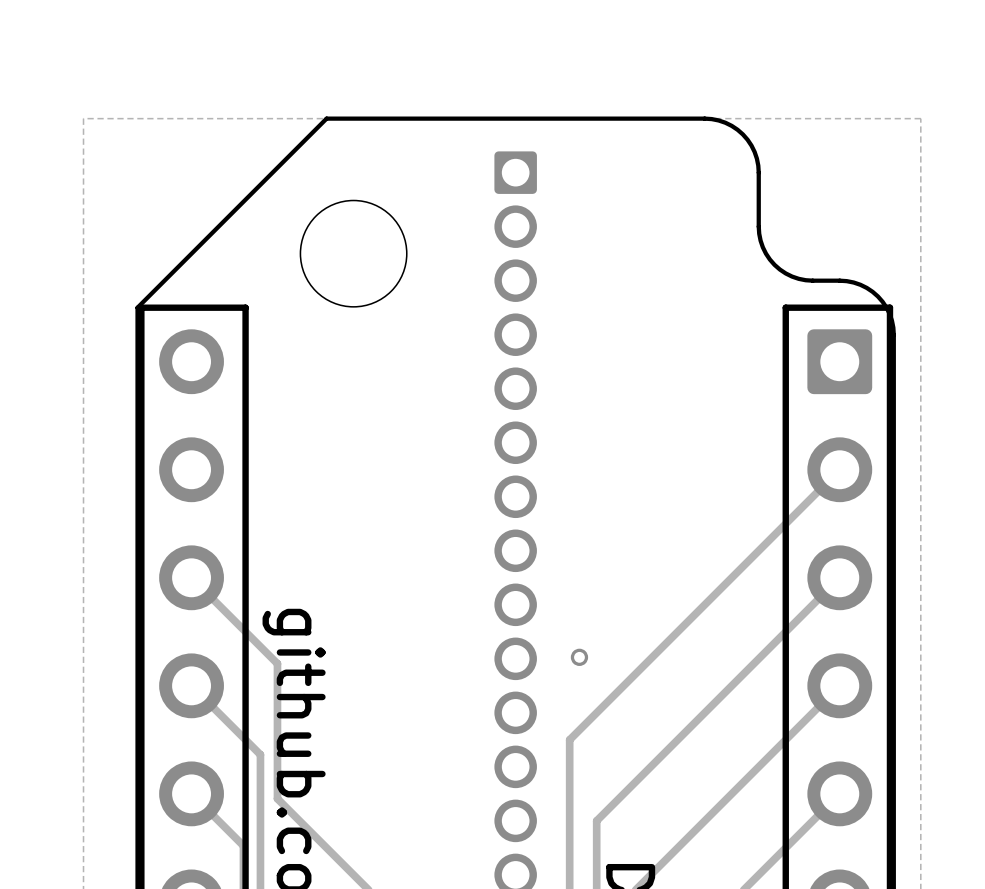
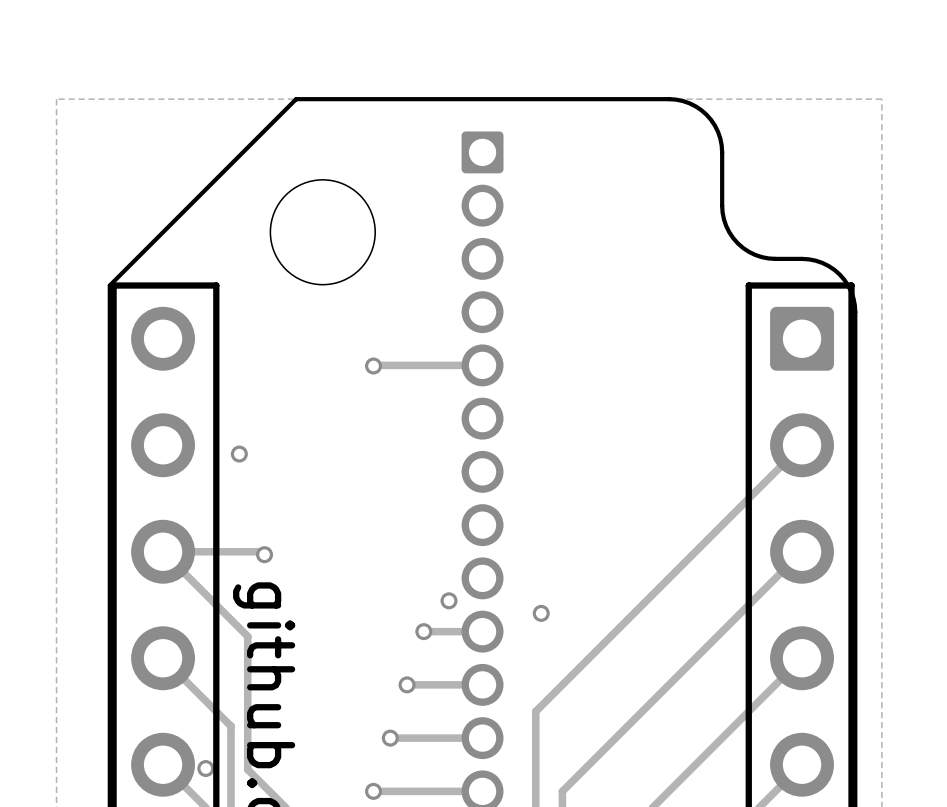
track: none -> (482, 365) (373, 366)
via: none -> (373, 366)
via: none -> (239, 454)
track: none -> (163, 551) (261, 551) (264, 554)
via: none -> (264, 554)
via: none -> (449, 600)
via position: (579, 657) -> (541, 613)
via: none -> (423, 631)
track: none -> (482, 631) (423, 631)
via: none -> (407, 684)
track: none -> (482, 684) (407, 684)
via: none -> (390, 738)
track: none -> (482, 738) (390, 738)
via: none -> (205, 768)
via: none -> (373, 791)
track: none -> (482, 791) (373, 791)

